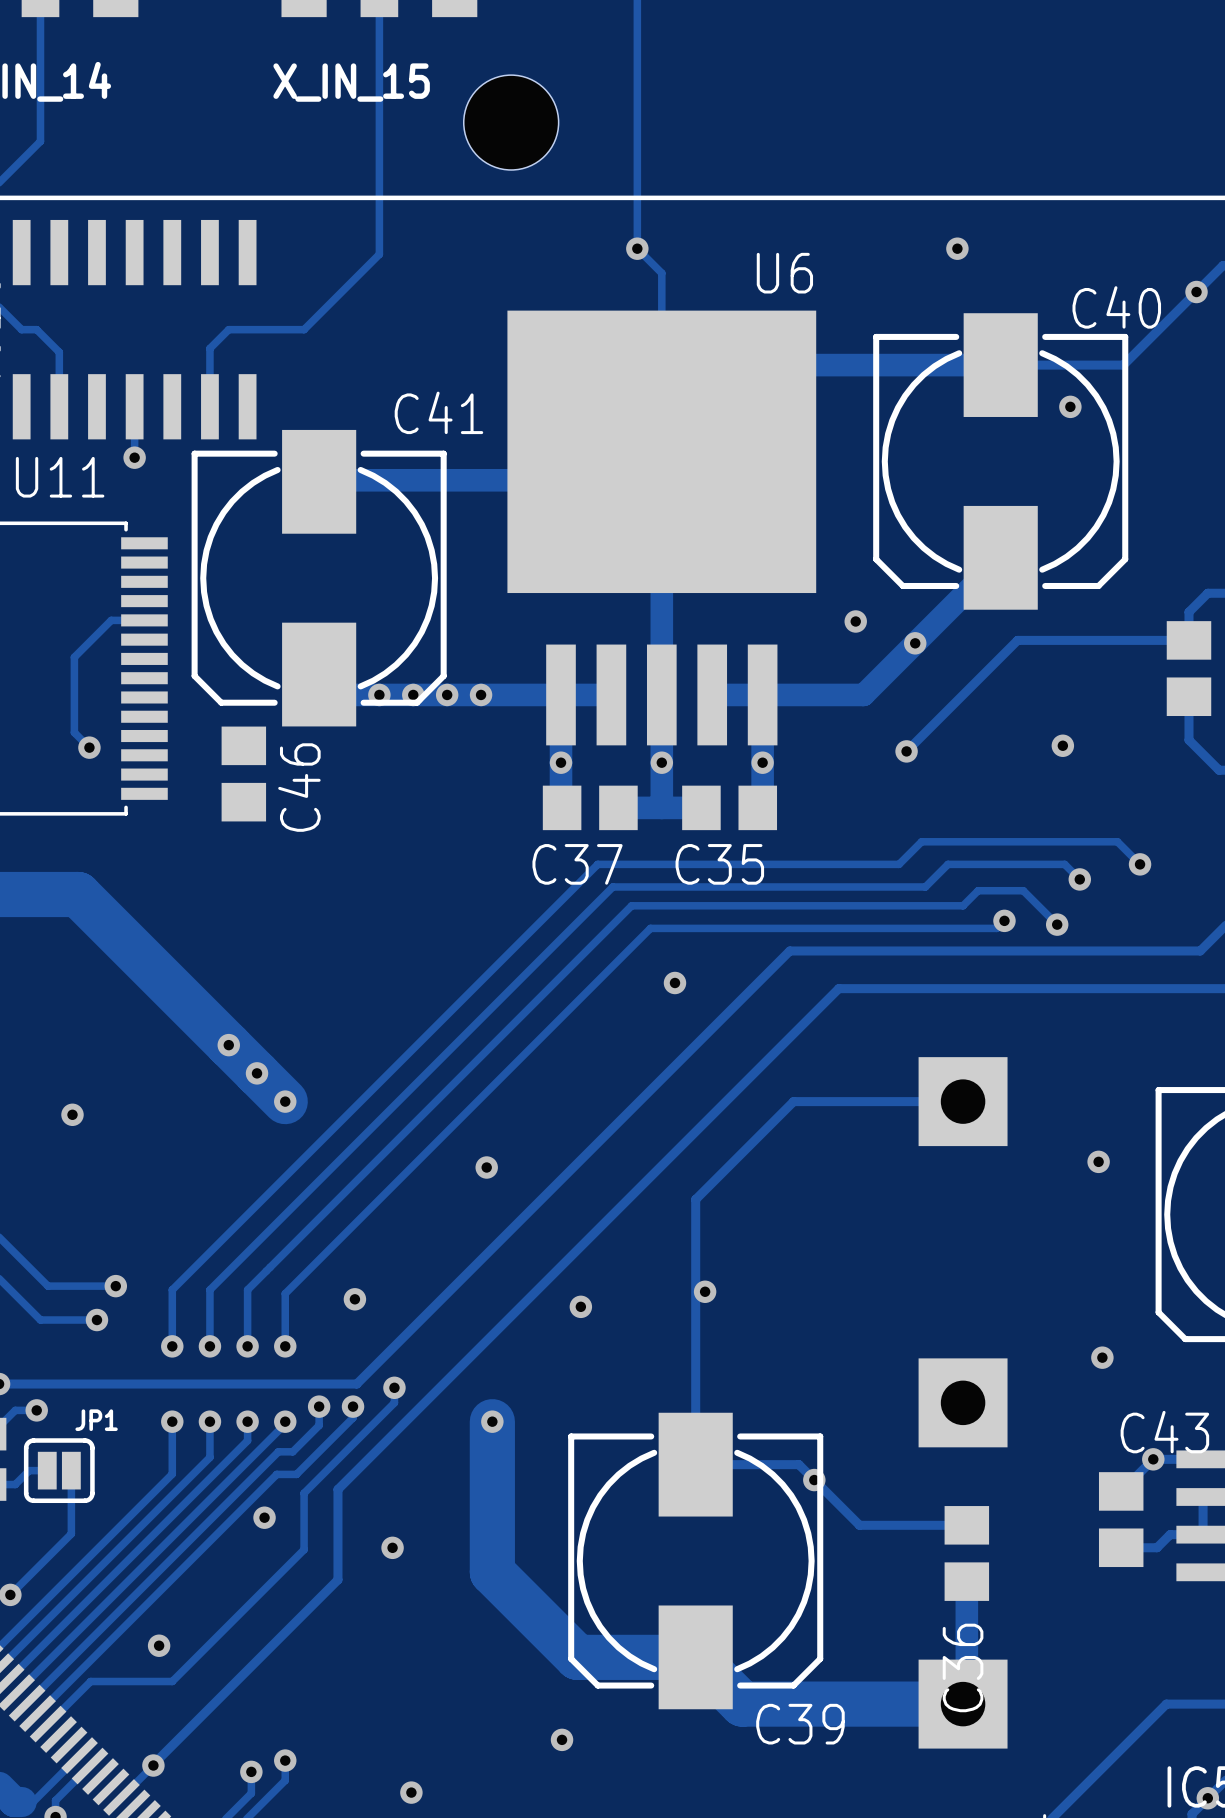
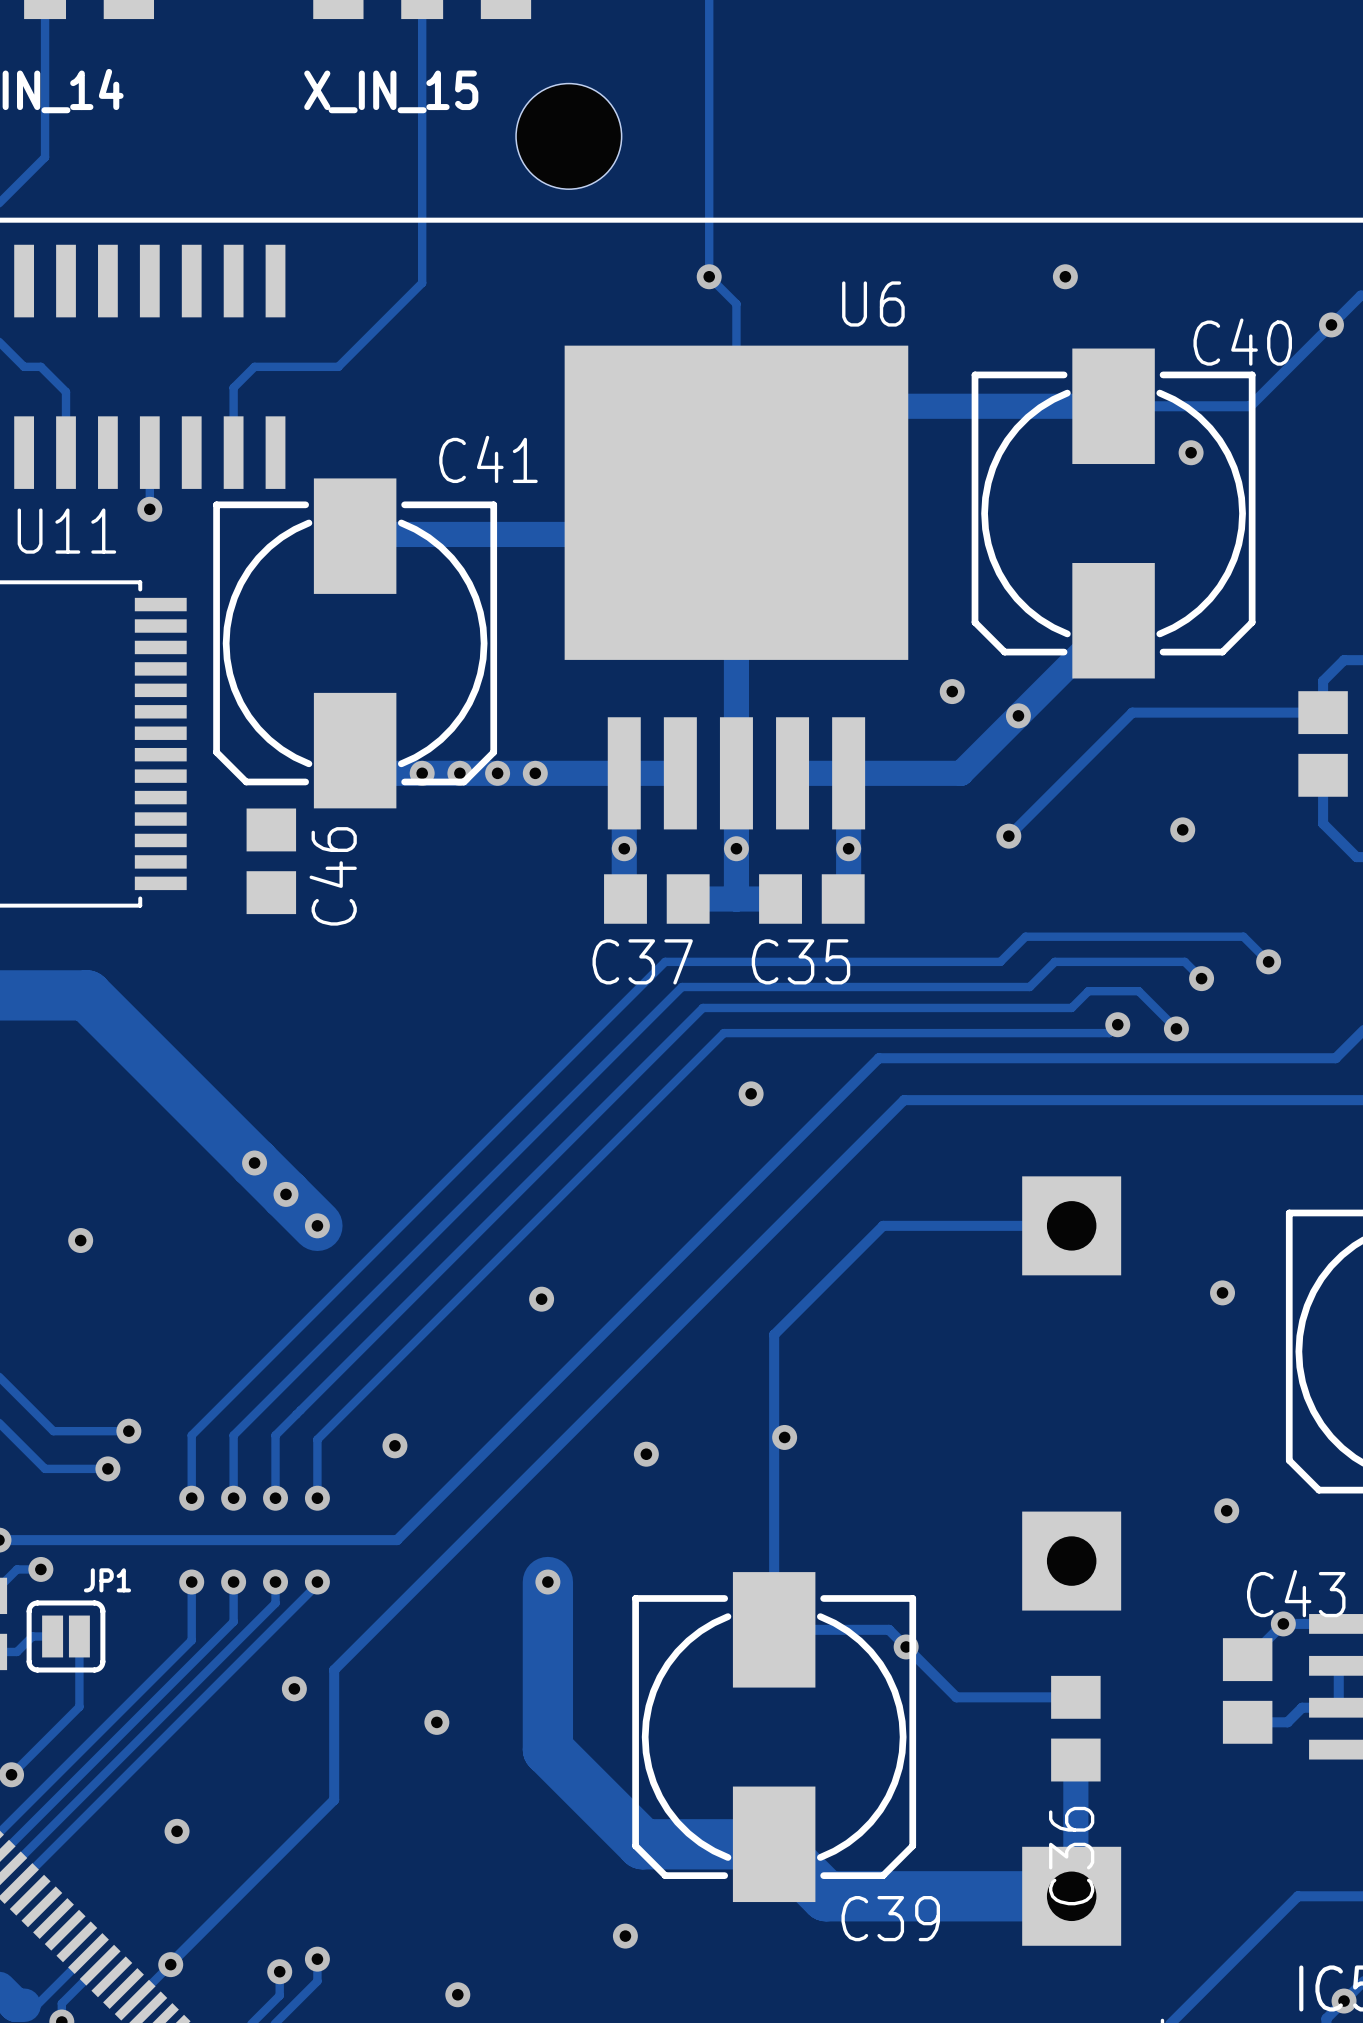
track: (144, 620) (111, 620) (74, 657) (74, 732) (89, 747) -> none
via: (89, 747) -> none
track: (838, 988) (337, 1489) (337, 1579) (300, 1617) -> (933, 1100) (904, 1100) (334, 1670) (334, 1799)
track: (394, 1387) (394, 1402) (304, 1493) (304, 1549) (172, 1681) (90, 1681) (48, 1724) -> none
via: (394, 1387) -> none
track: (319, 1406) (319, 1425) (292, 1451) (278, 1451) (27, 1703) -> none
via: (319, 1406) -> none
track: (353, 1406) (353, 1417) (296, 1474) (276, 1474) (37, 1713) -> none
via: (353, 1406) -> none

